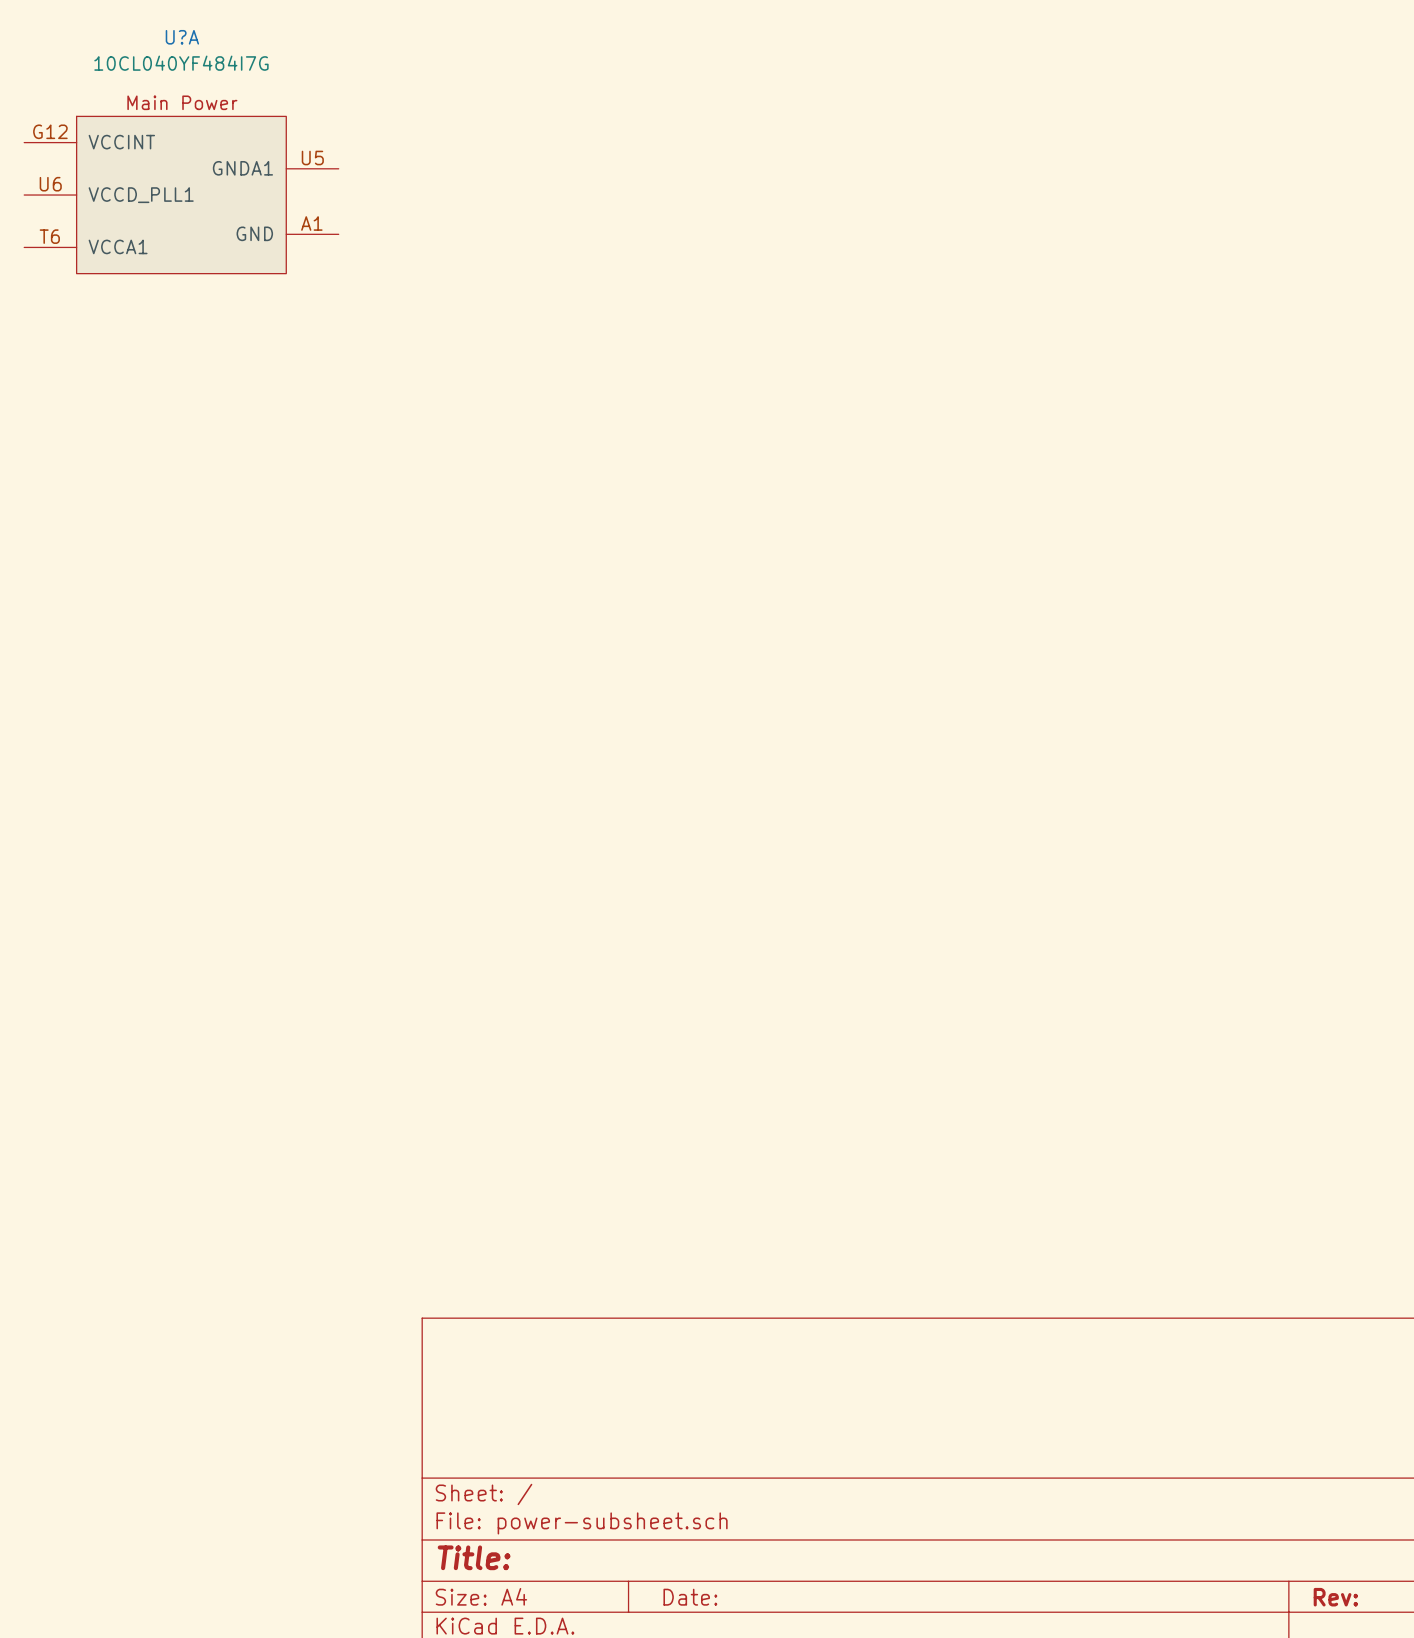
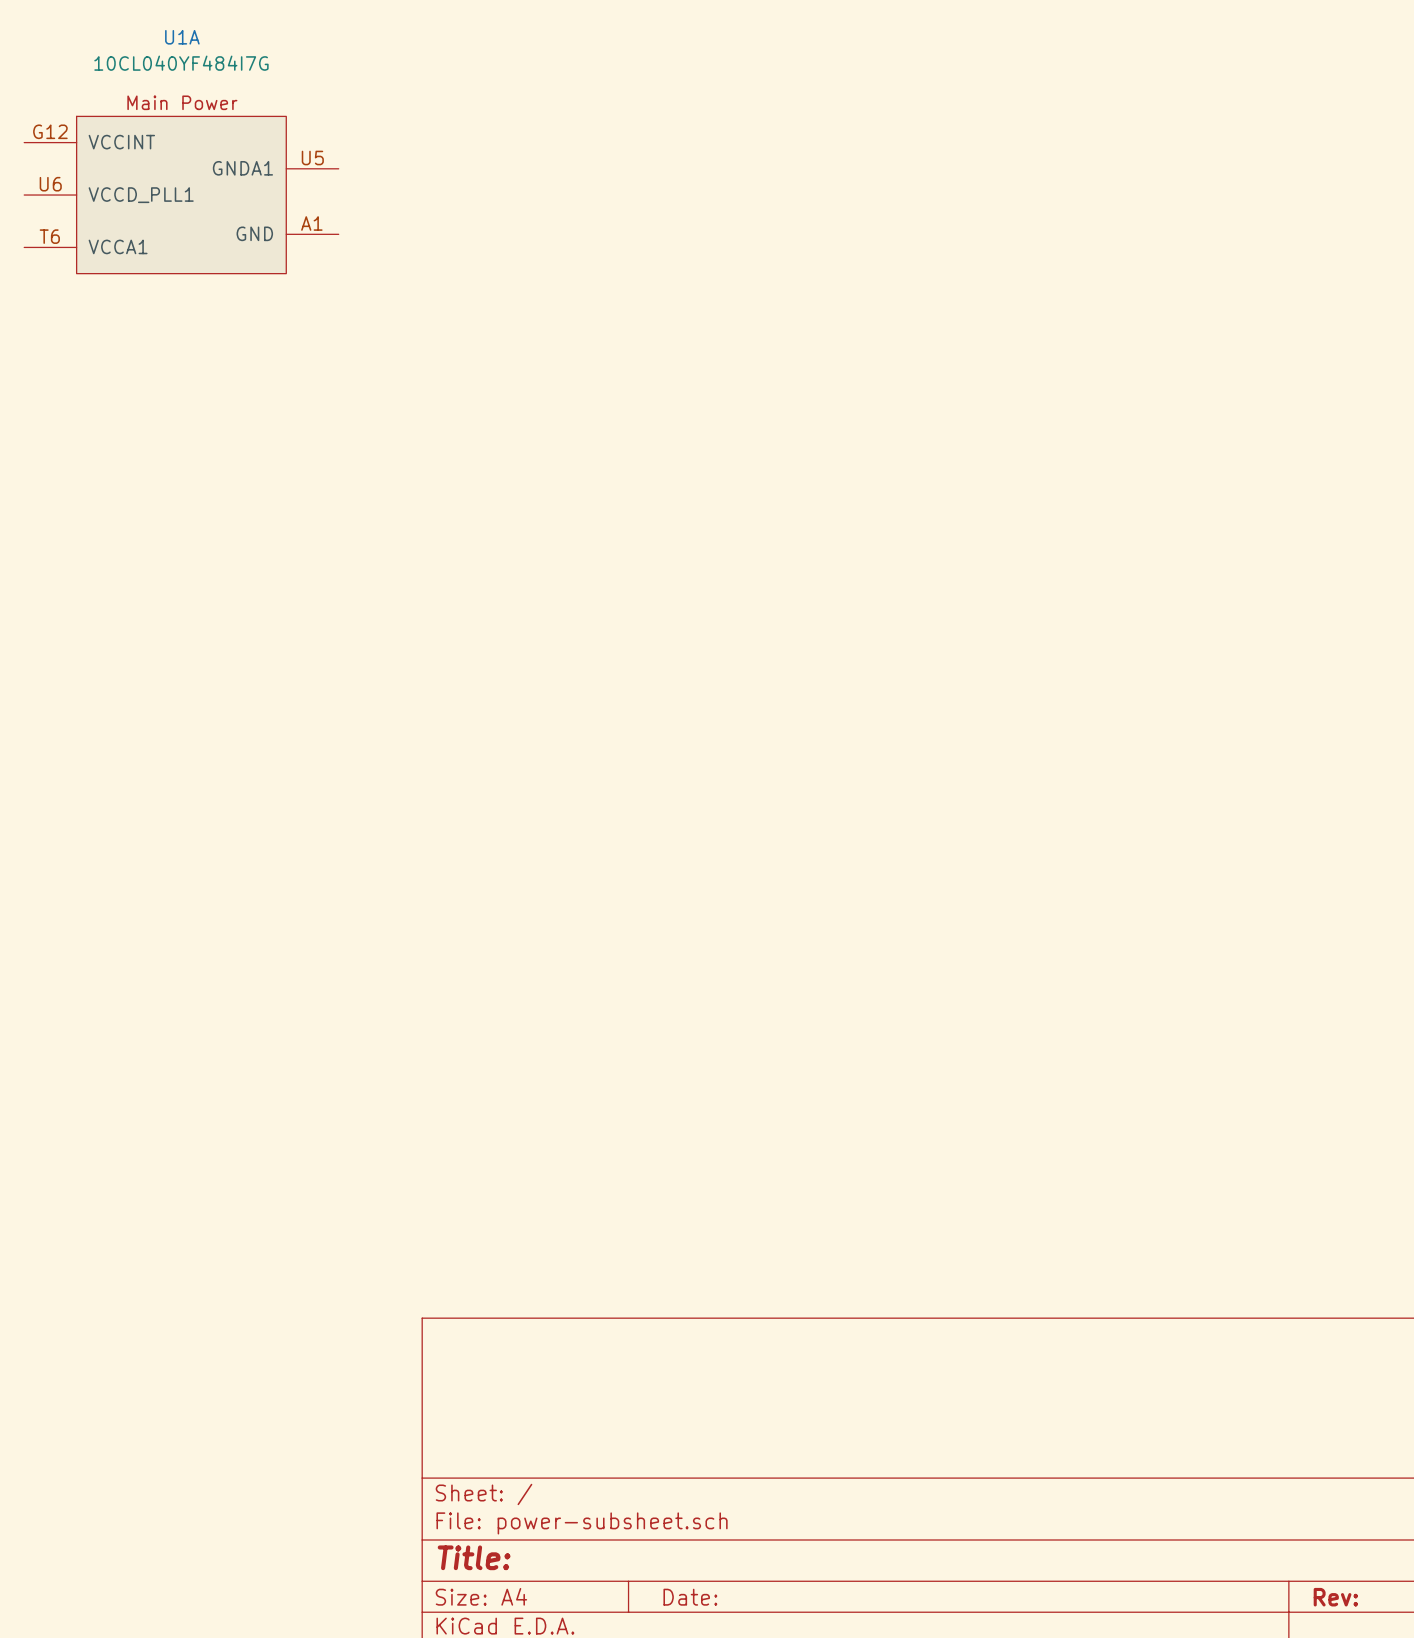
U?A name: U?A (182, 37) -> U1A (182, 37)

